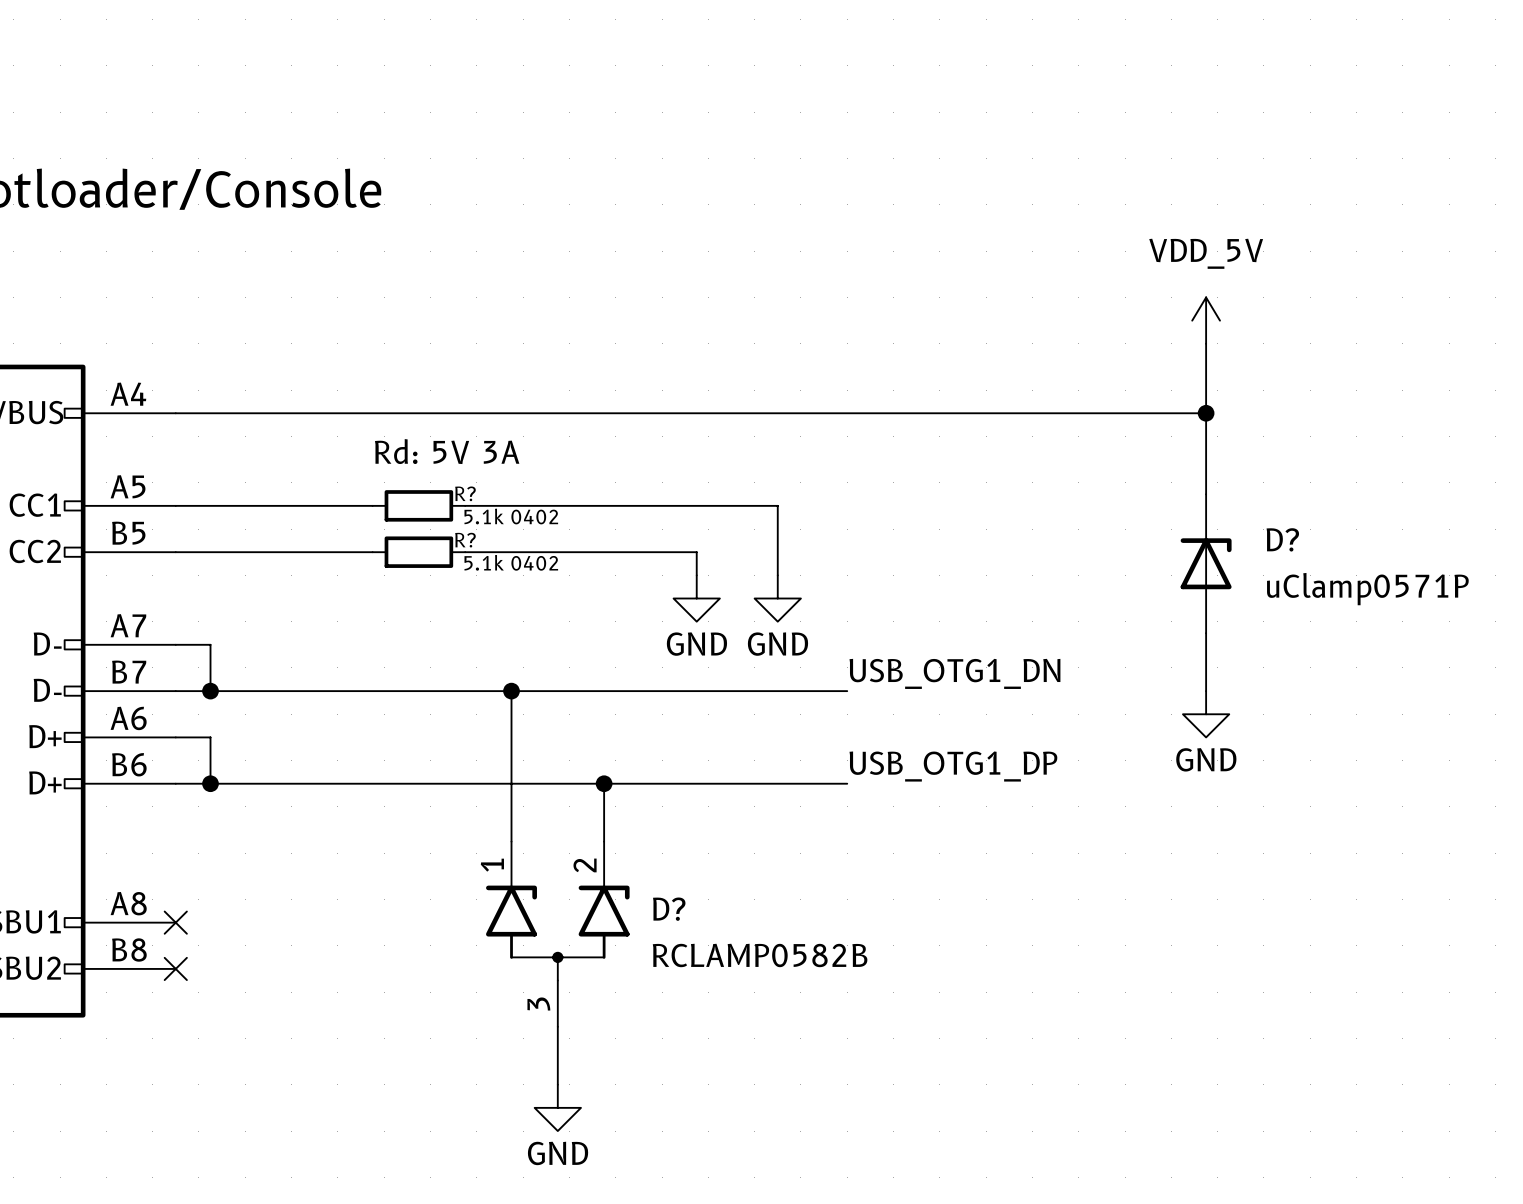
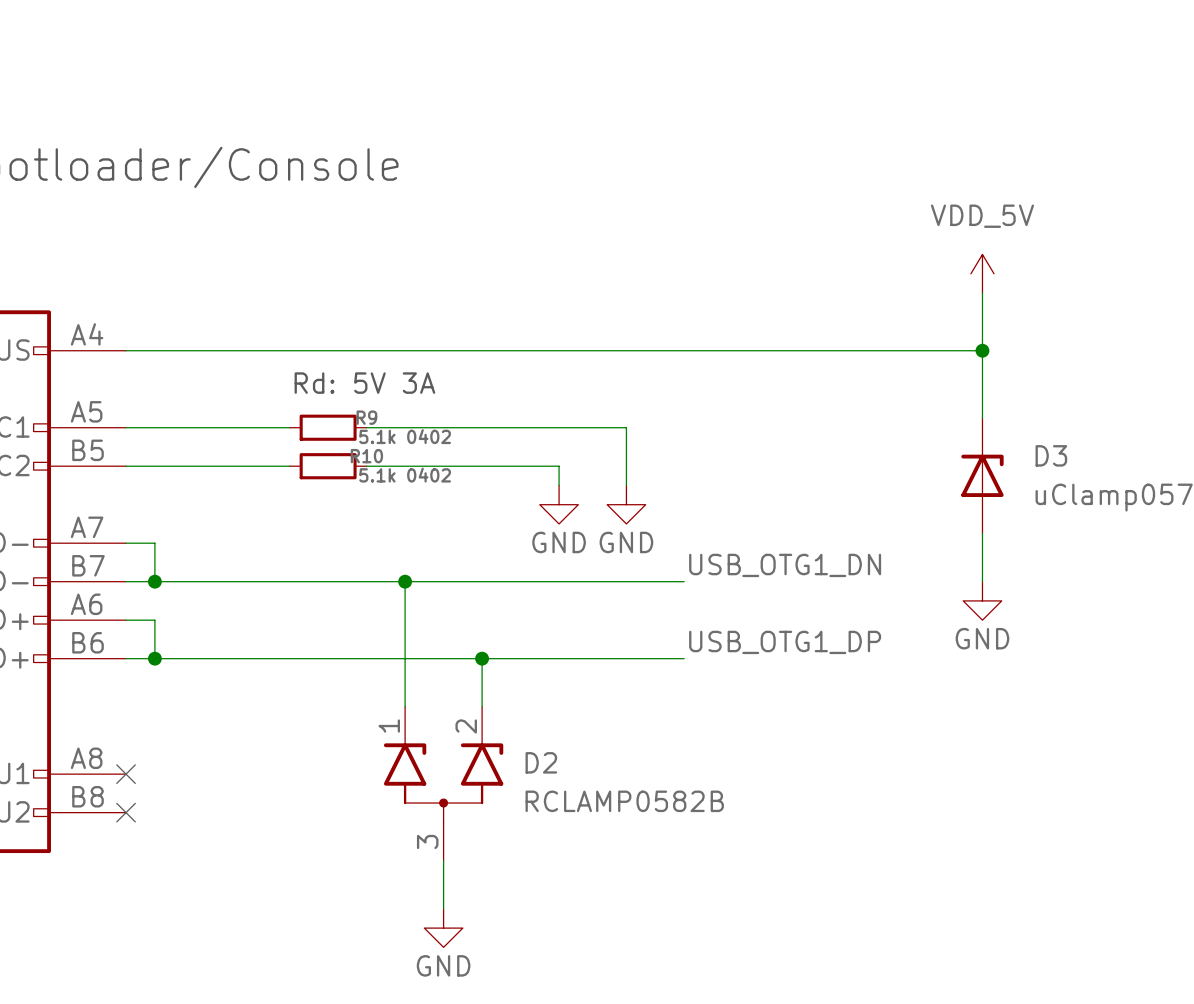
R? name: R? (465, 493) -> R9 (366, 417)
D? name: D? (1282, 539) -> D3 (1051, 455)
R? name: R? (465, 540) -> R10 (366, 456)
D? name: D? (669, 909) -> D2 (541, 762)

